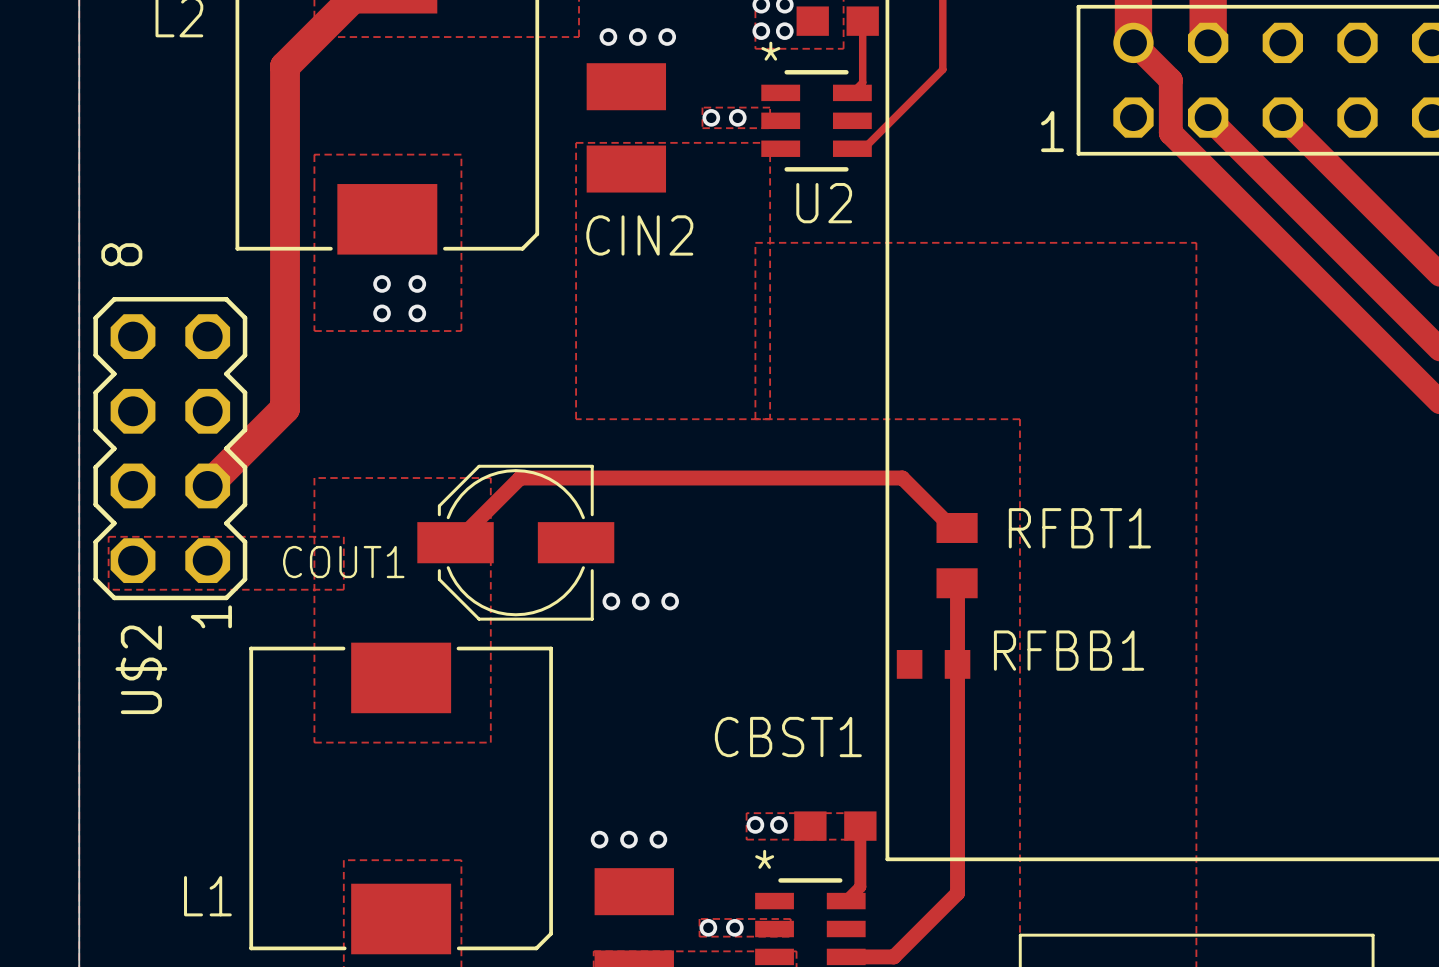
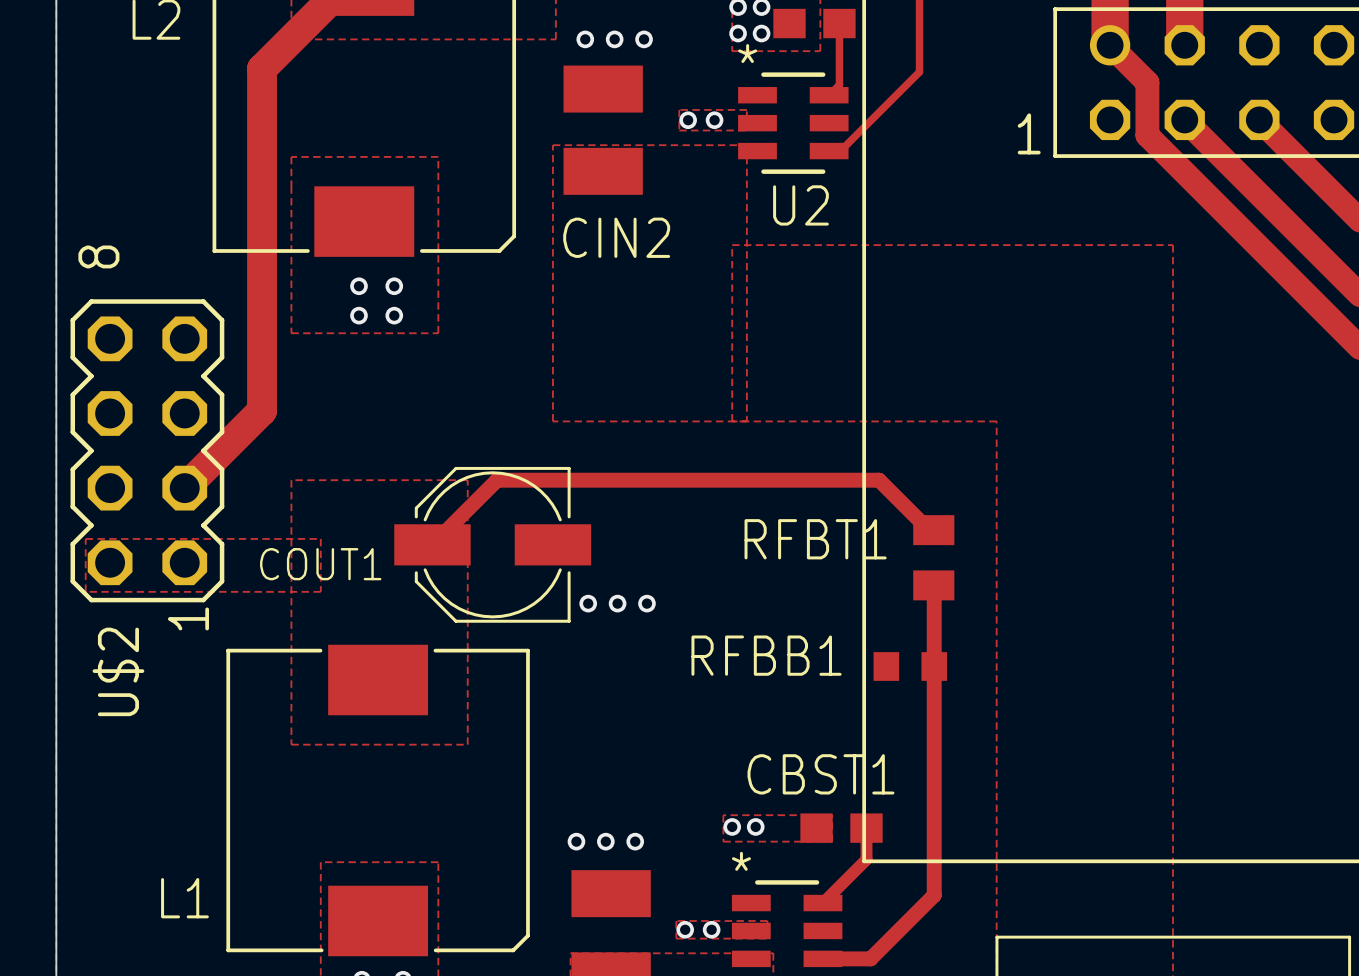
RFBT1 name position: RFBT1 (1079, 528) -> RFBT1 (815, 539)
RFBB1 name position: RFBB1 (1069, 650) -> RFBB1 (766, 655)
CBST1 name position: CBST1 (788, 737) -> CBST1 (820, 774)
CBST1 position: (835, 826) -> (841, 828)
track: (860, 826) (860, 886) -> (866, 828) (866, 859) (837, 888)

